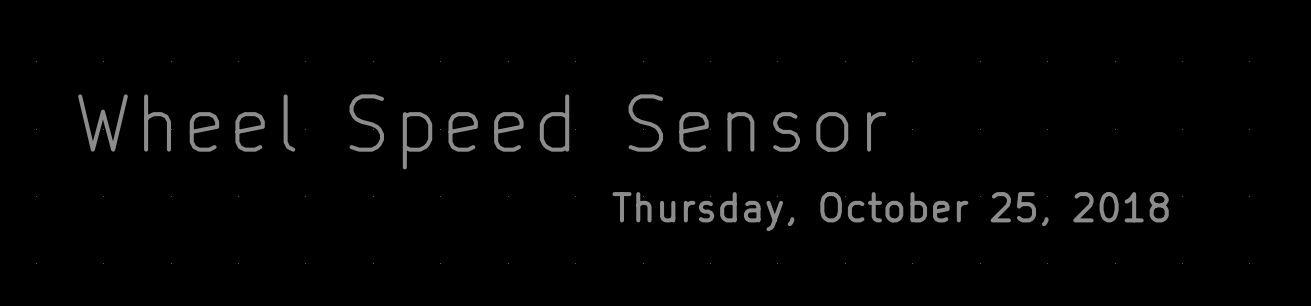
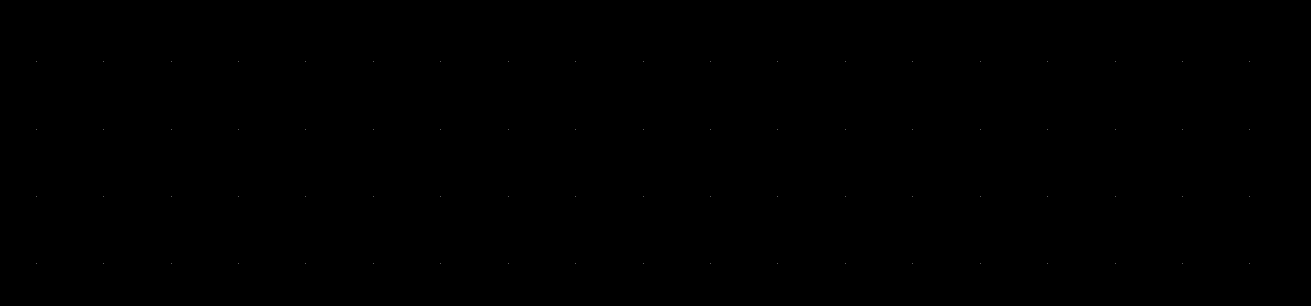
text: Wheel Speed Sensor (482, 131) -> none
text: Thursday, October 25, 2018 (890, 211) -> none

